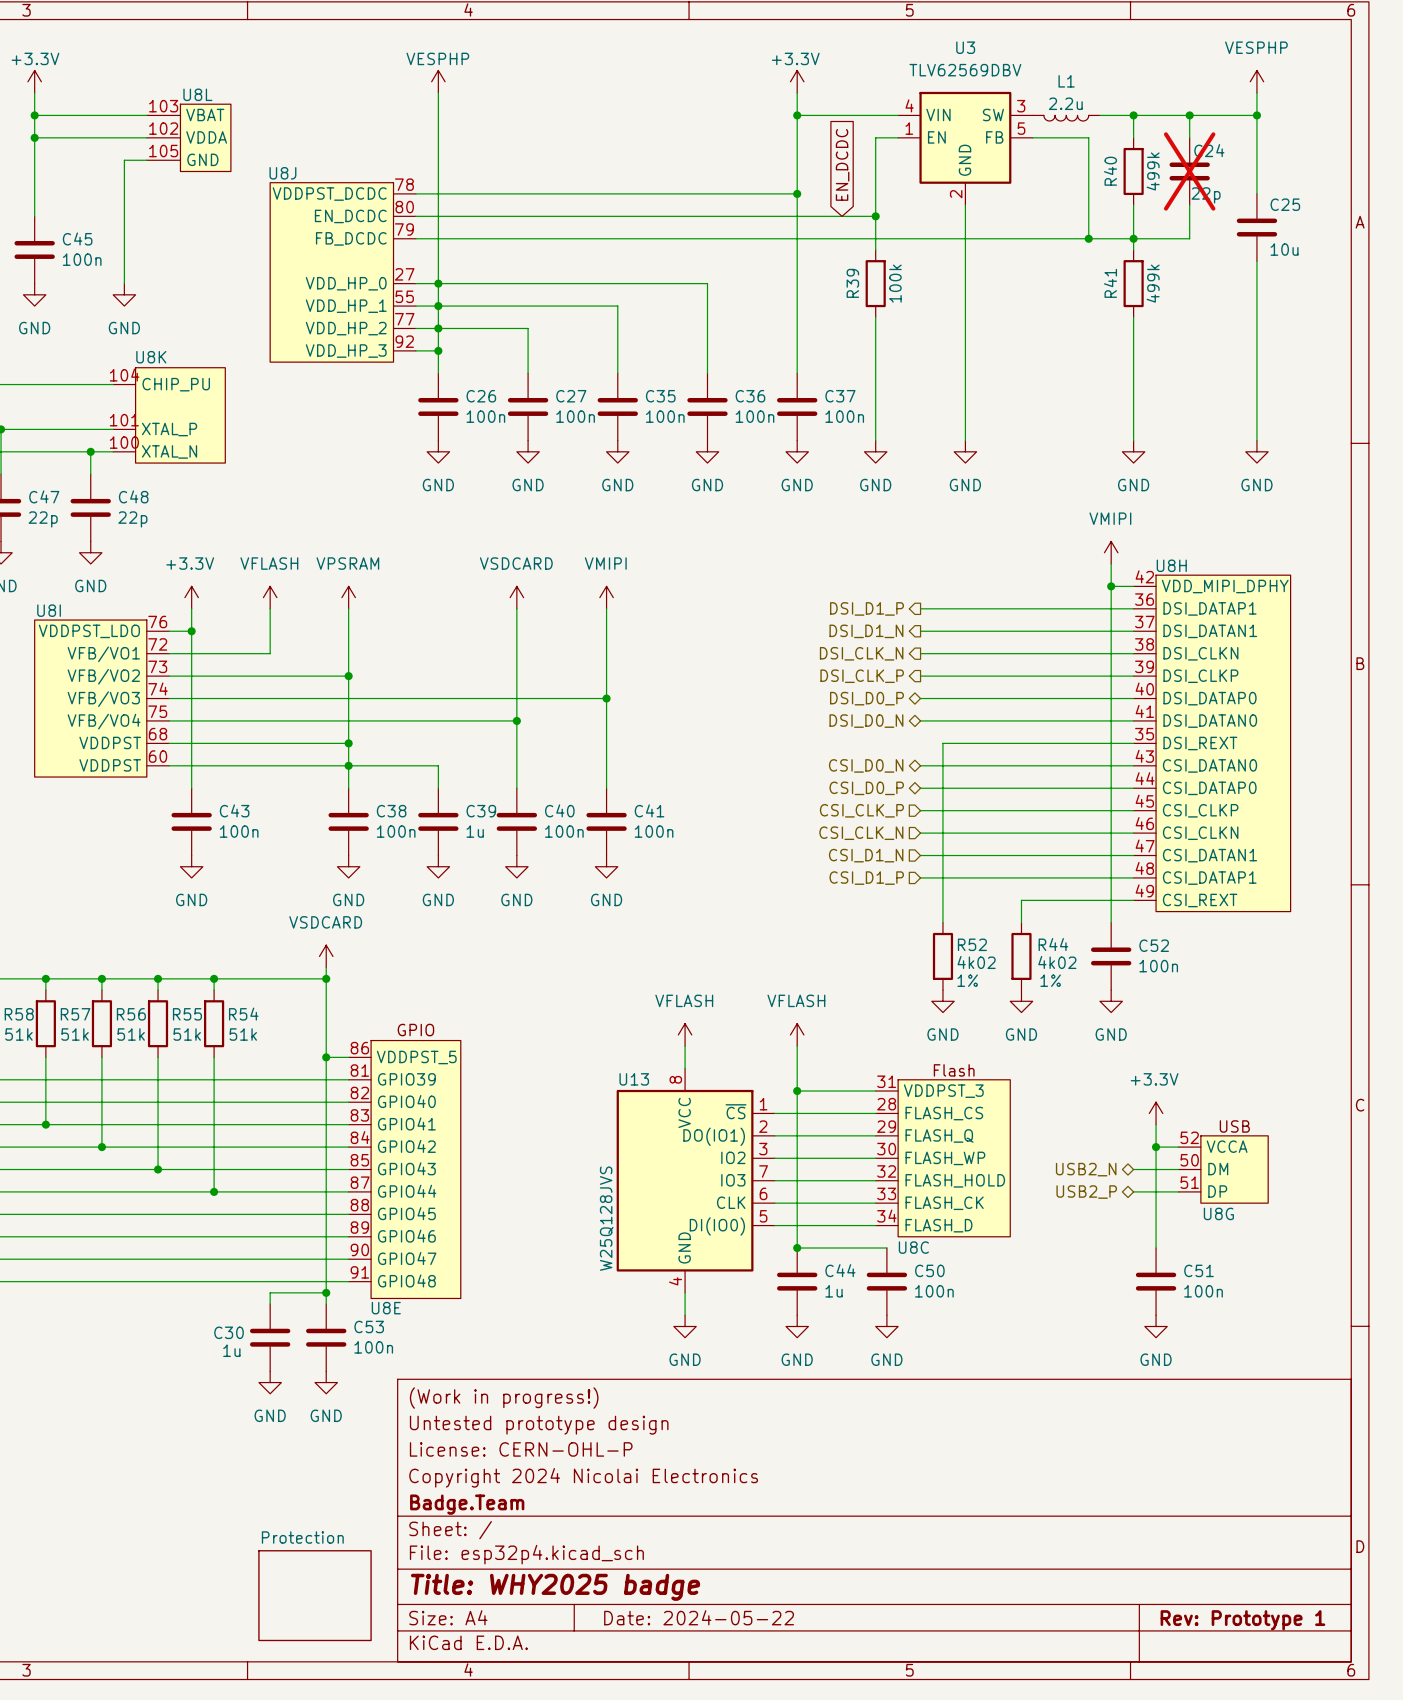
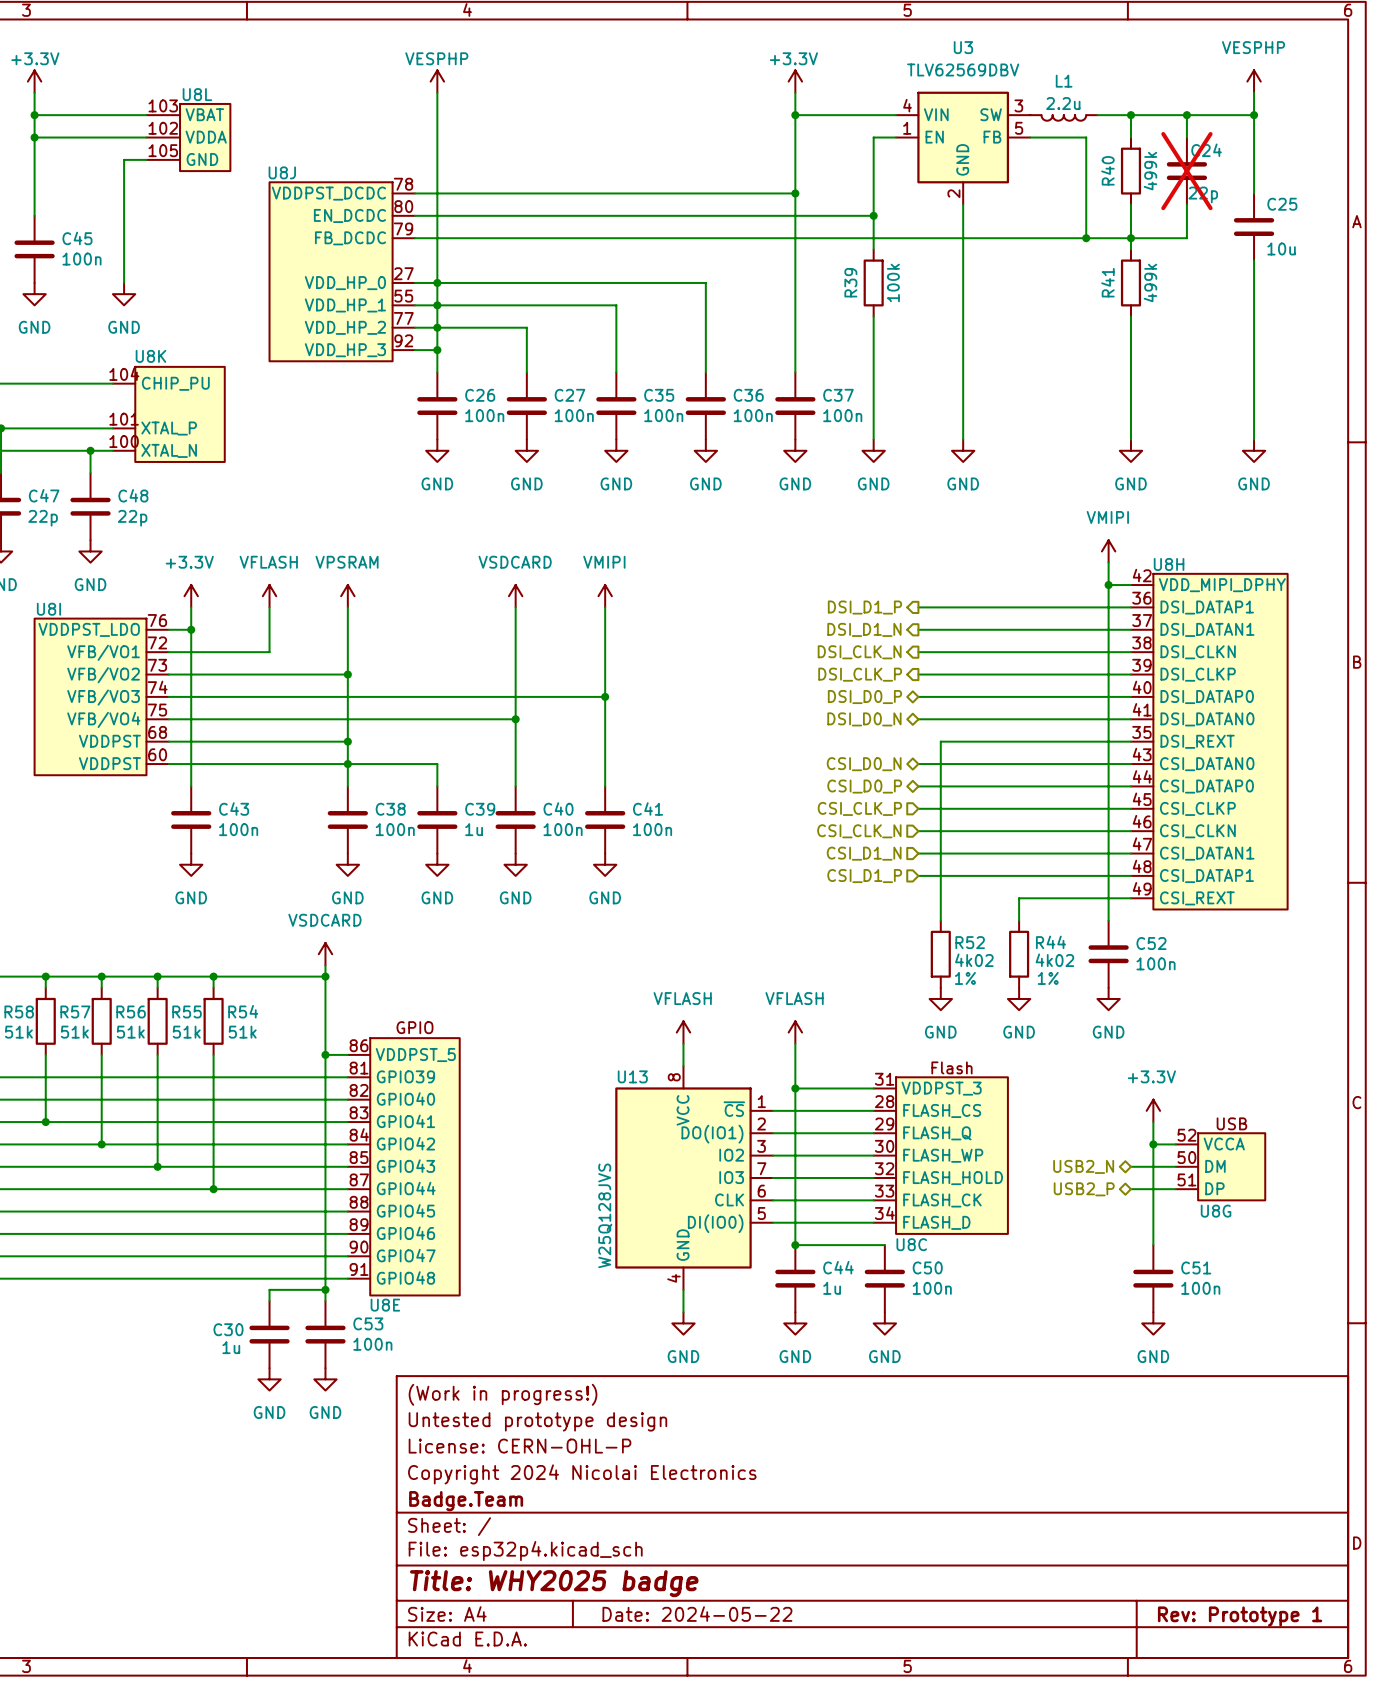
global label: EN_DCDC (842, 164) -> none
sheet Protection: (315, 1595) -> none

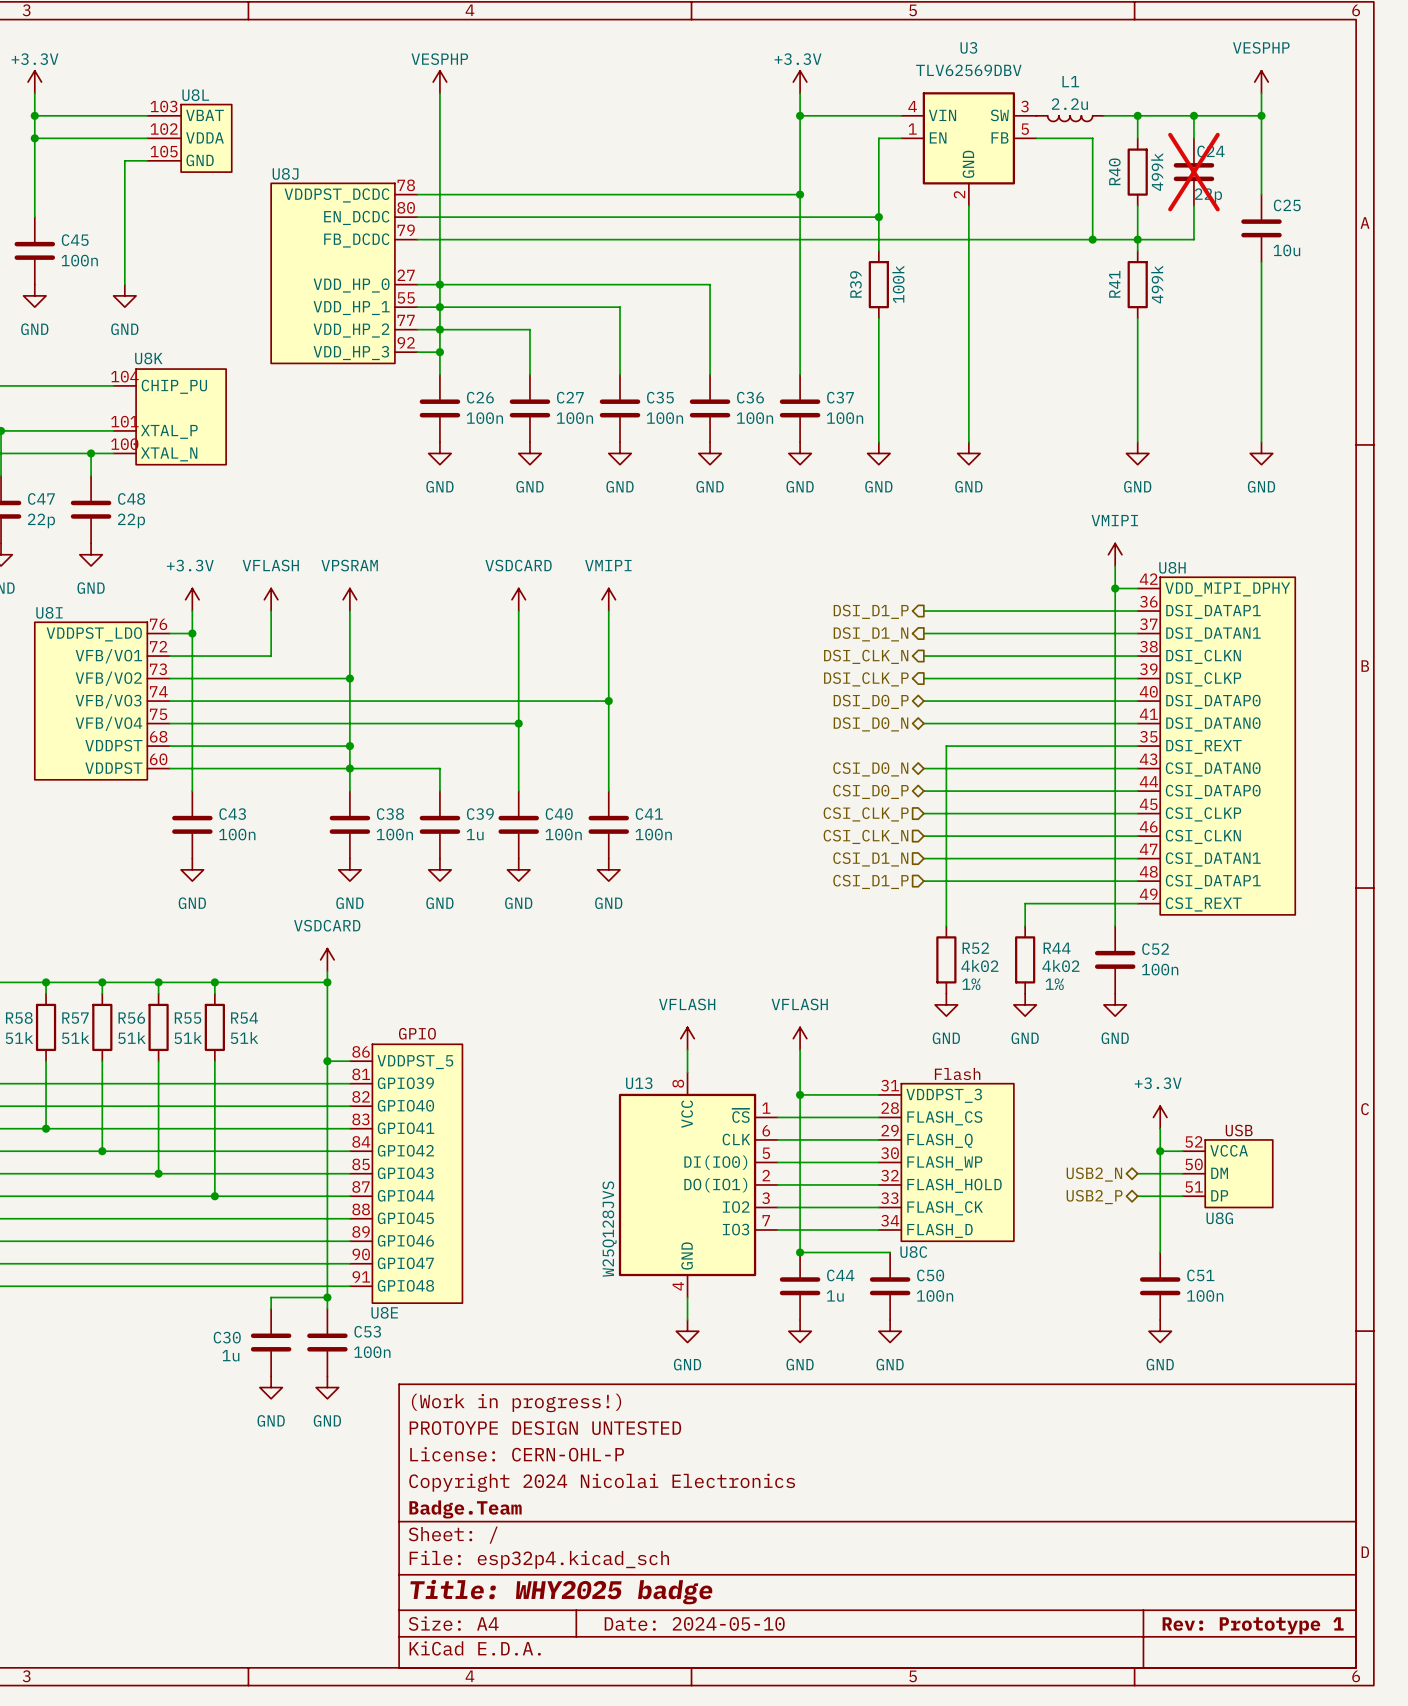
U13 symbol: [615, 1066, 773, 1290] -> [618, 1072, 778, 1298]
title block: Untested prototype design (537, 1421) -> PROTOYPE DESIGN UNTESTED (545, 1428)
title block: Date: 2024-05-22 (697, 1614) -> Date: 2024-05-10 (694, 1623)

